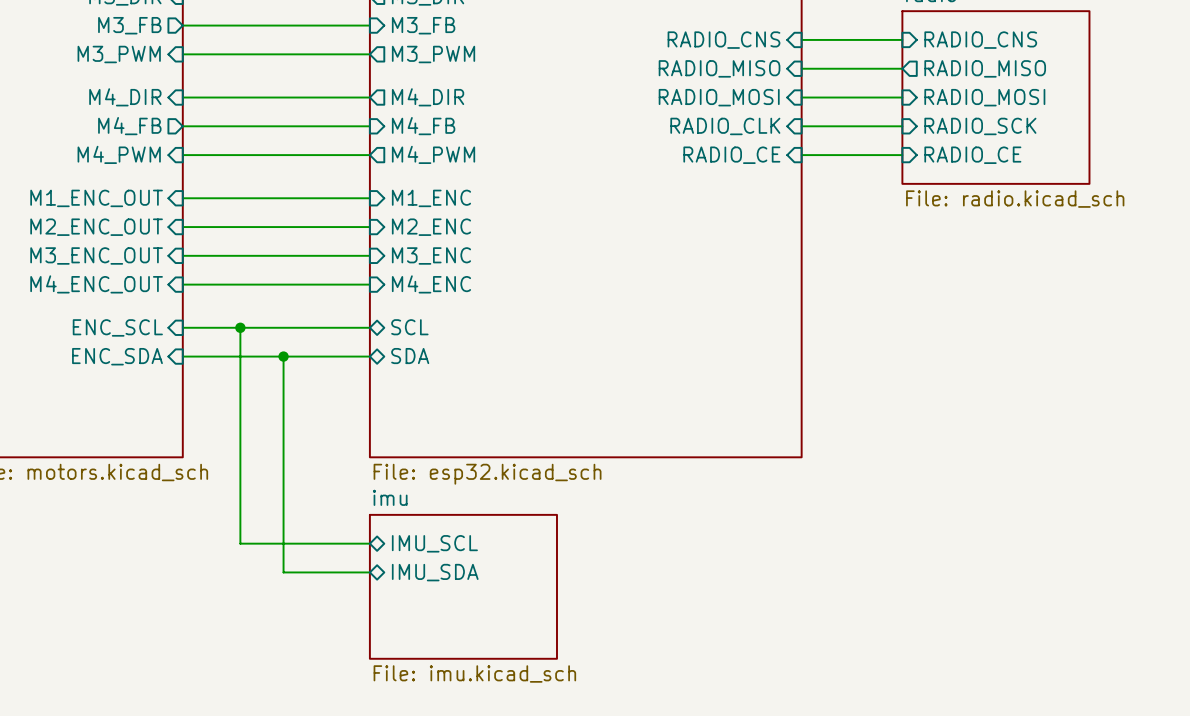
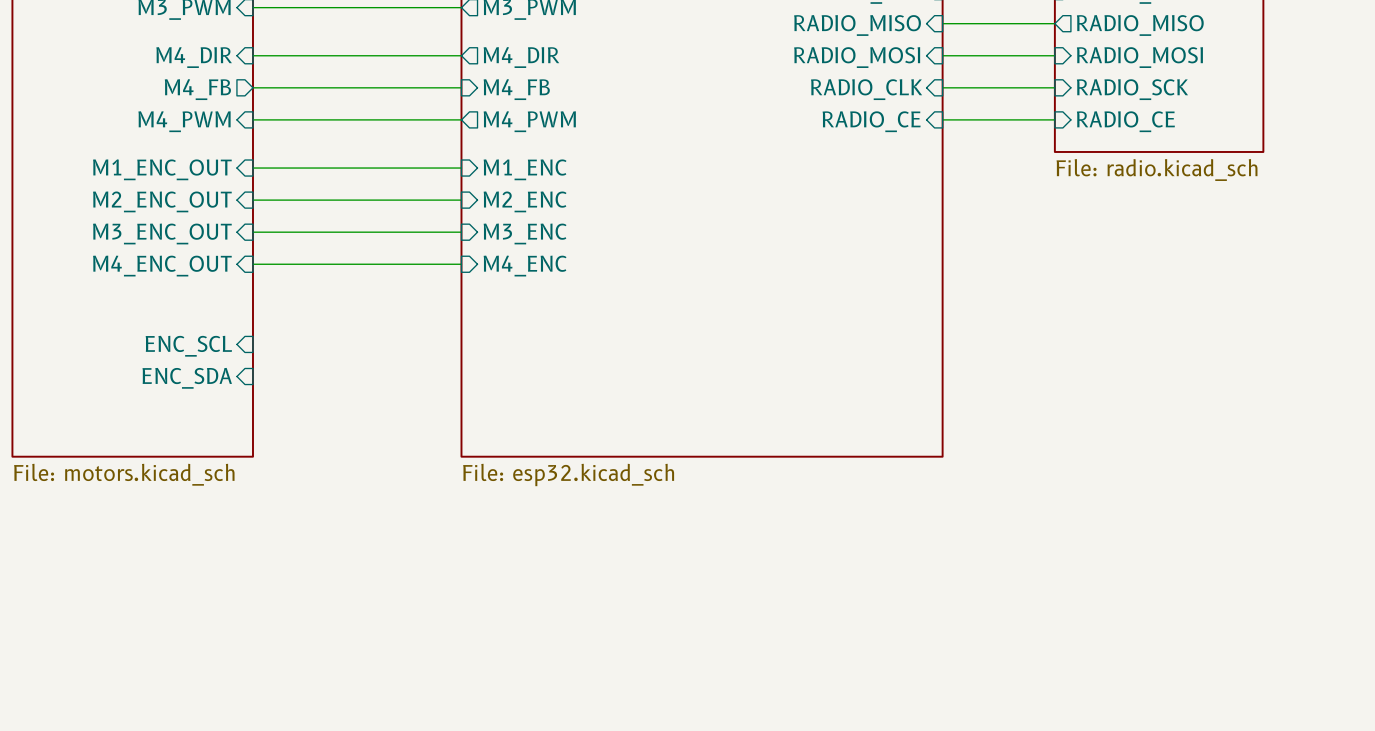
sheet pin: ENC_SCL (117, 327) -> none
wire: (182, 327) (369, 327) -> none
wire: (240, 327) (240, 543) (369, 543) -> none
junction: (240, 327) -> none
sheet pin: SCL (409, 327) -> none
sheet pin: ENC_SDA (117, 356) -> ENC_SCL (188, 346)
wire: (182, 356) (369, 356) -> none
wire: (283, 356) (283, 572) (369, 572) -> none
junction: (283, 356) -> none
sheet pin: SDA (410, 356) -> none
sheet pin: none -> ENC_SDA (187, 378)
sheet pin: IMU_SCL (434, 543) -> none
sheet pin: IMU_SDA (435, 572) -> none
sheet imu: File: imu.kicad_sch (463, 586) -> none

